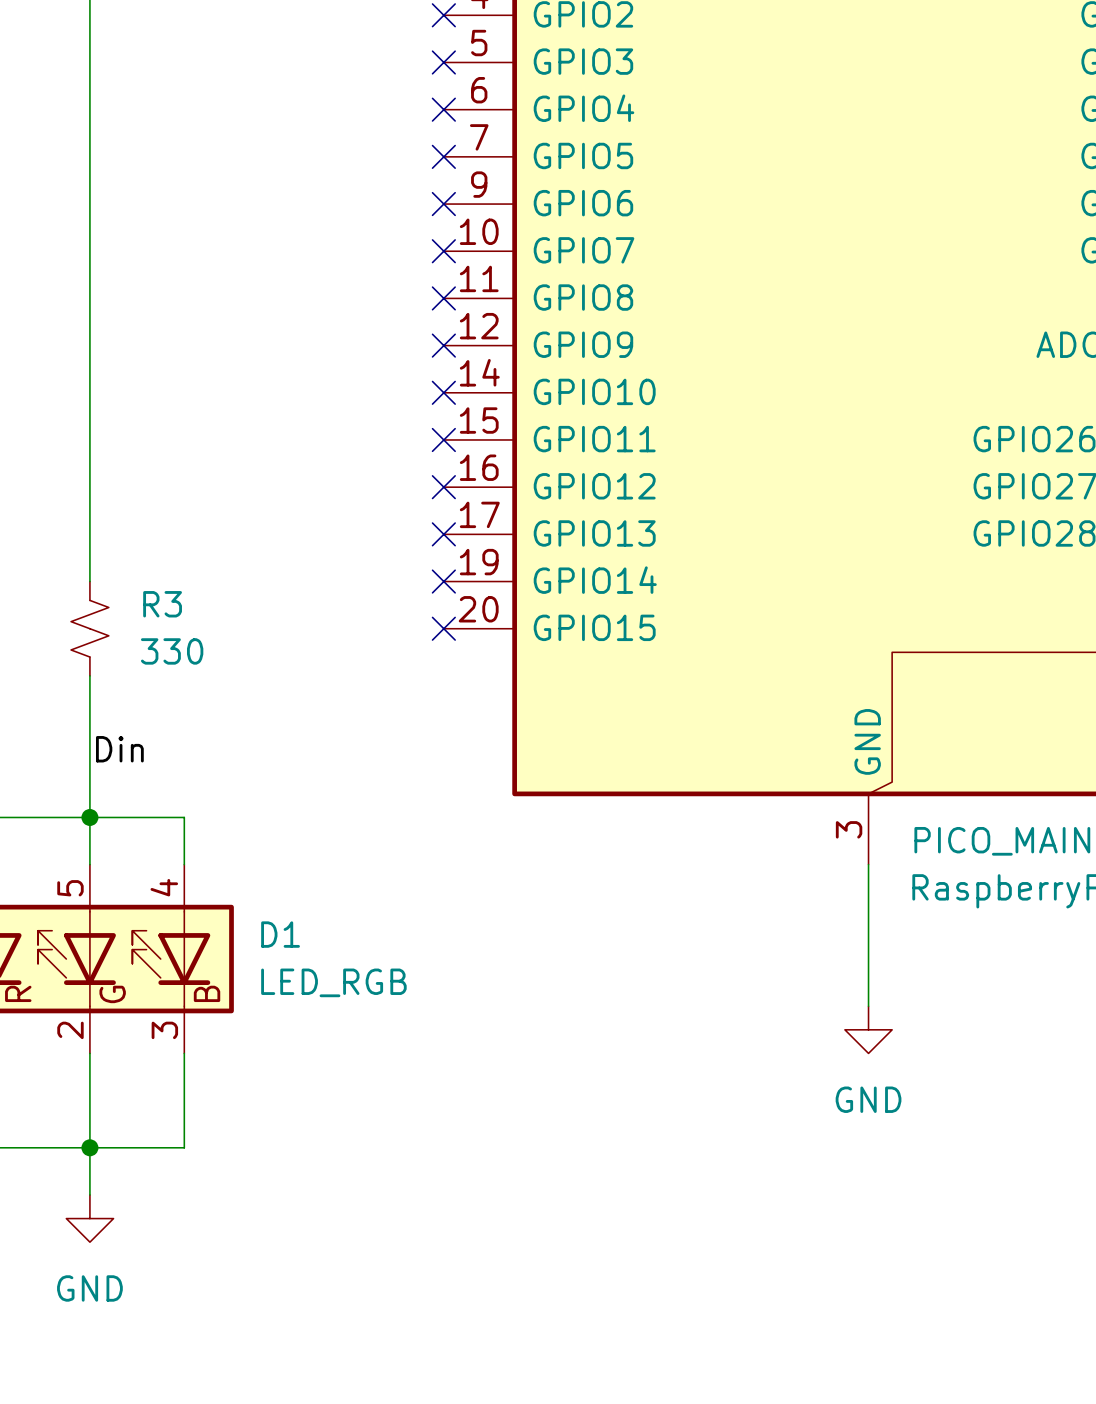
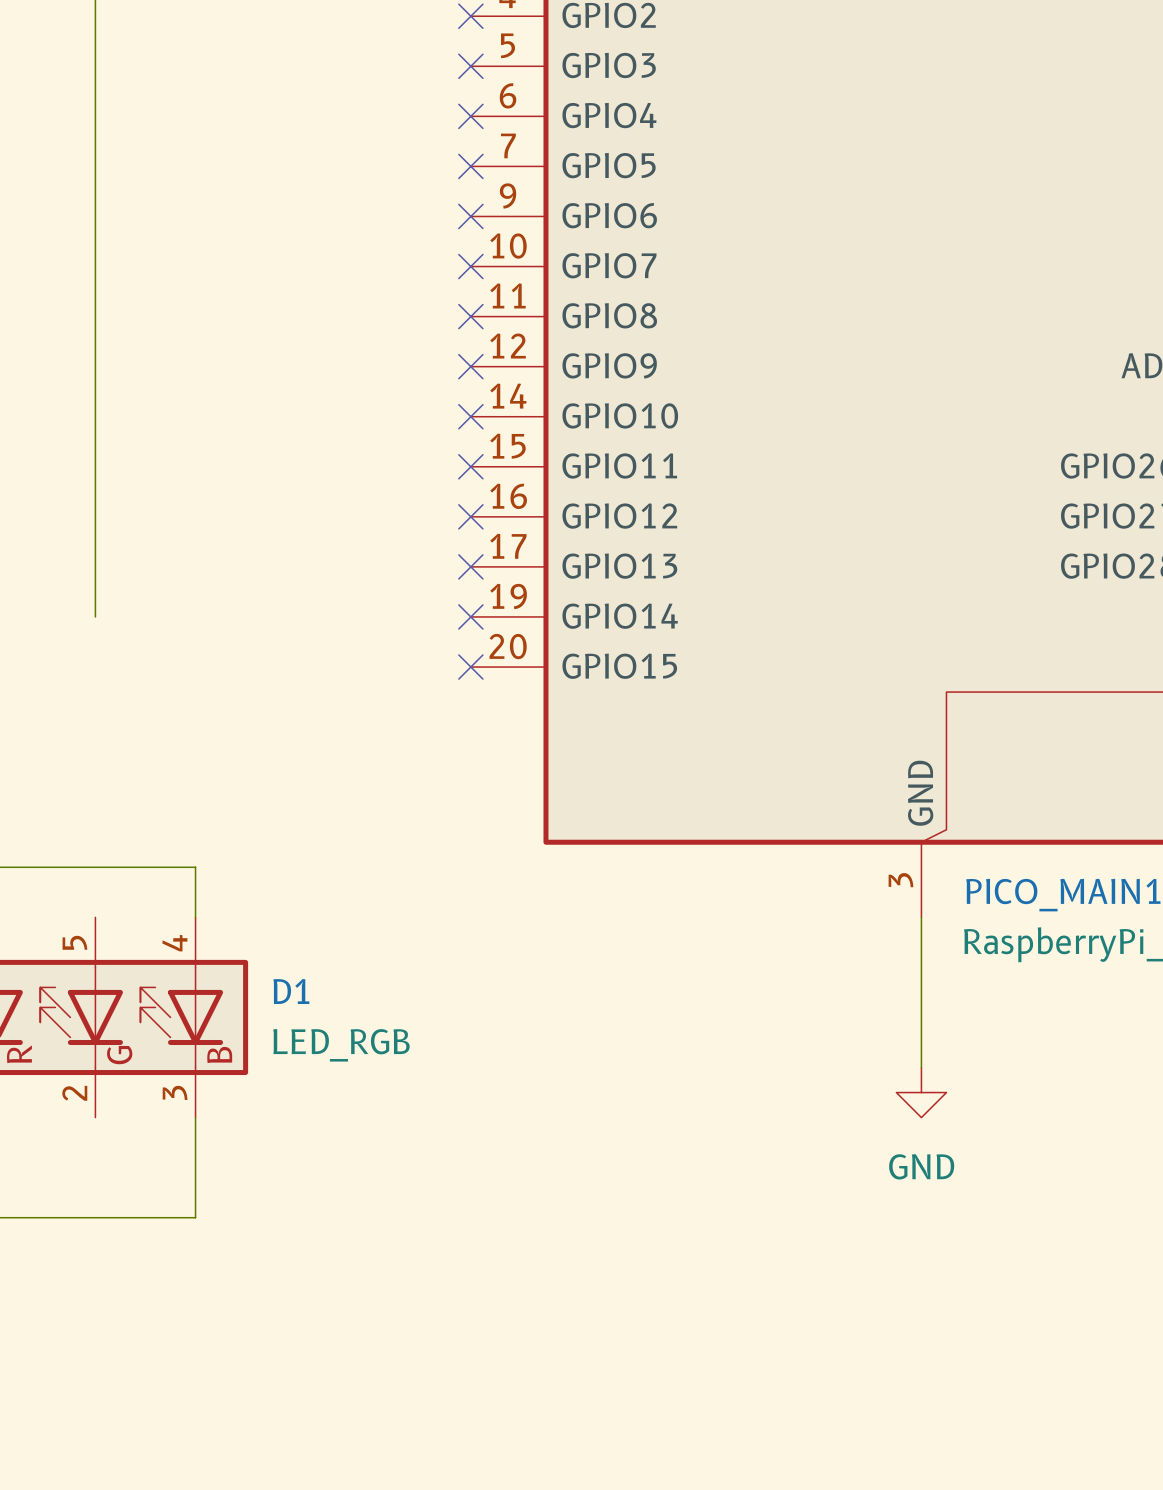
R3: 330 (89, 628) -> none
wire: (89, 675) (89, 864) -> none
label: Din (119, 749) -> none
junction: (89, 817) -> none
wire: (89, 1053) (89, 1194) -> none
junction: (89, 1147) -> none
power symbol: GND (89, 1218) -> none

